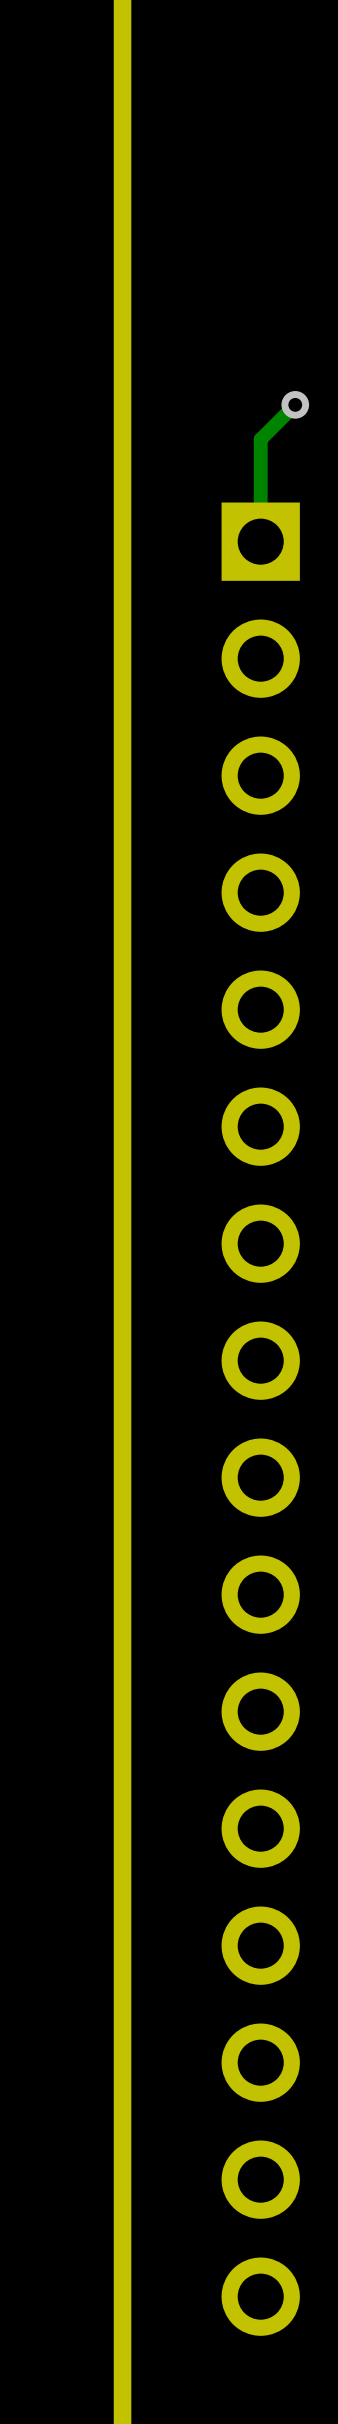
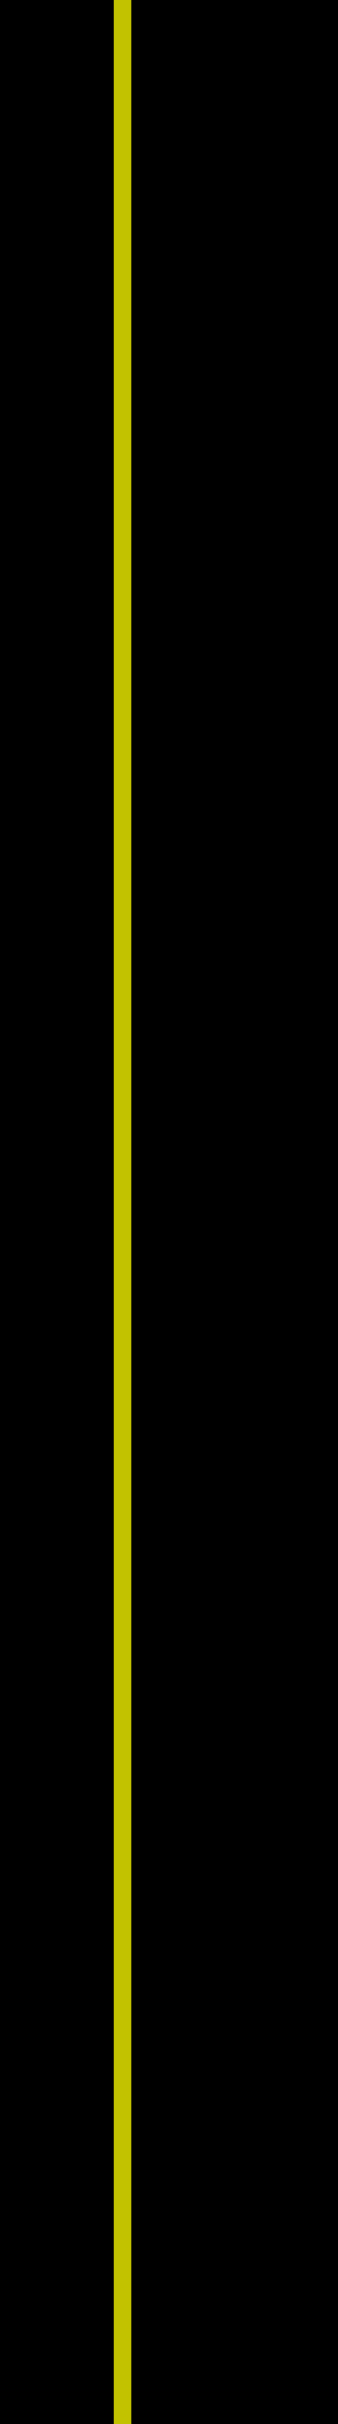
track: (295, 404) (260, 439) (260, 541) -> none
via: (295, 404) -> none
part: (260, 1419) -> none

